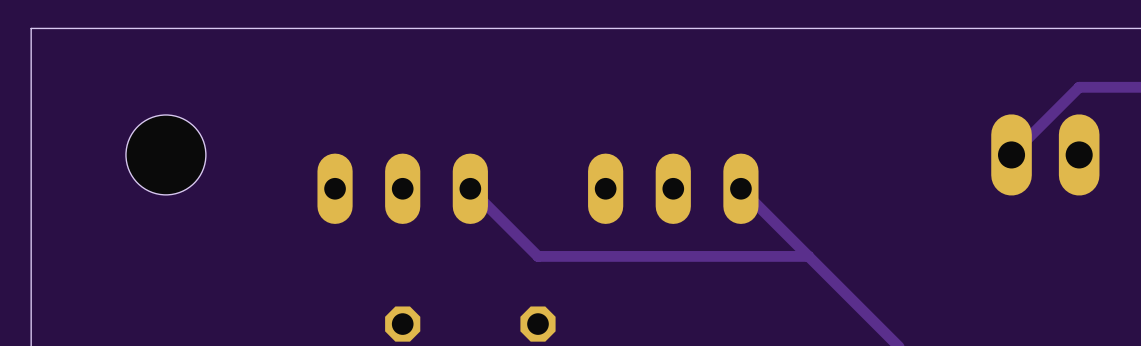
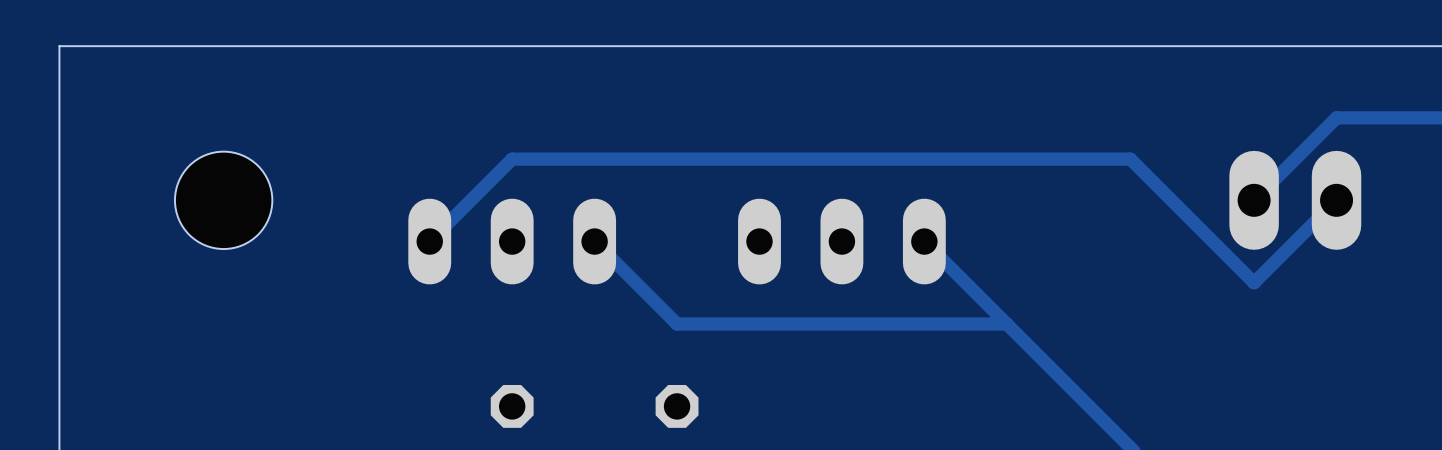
track: none -> (1336, 200) (1254, 282) (1130, 159) (512, 159) (429, 241)

